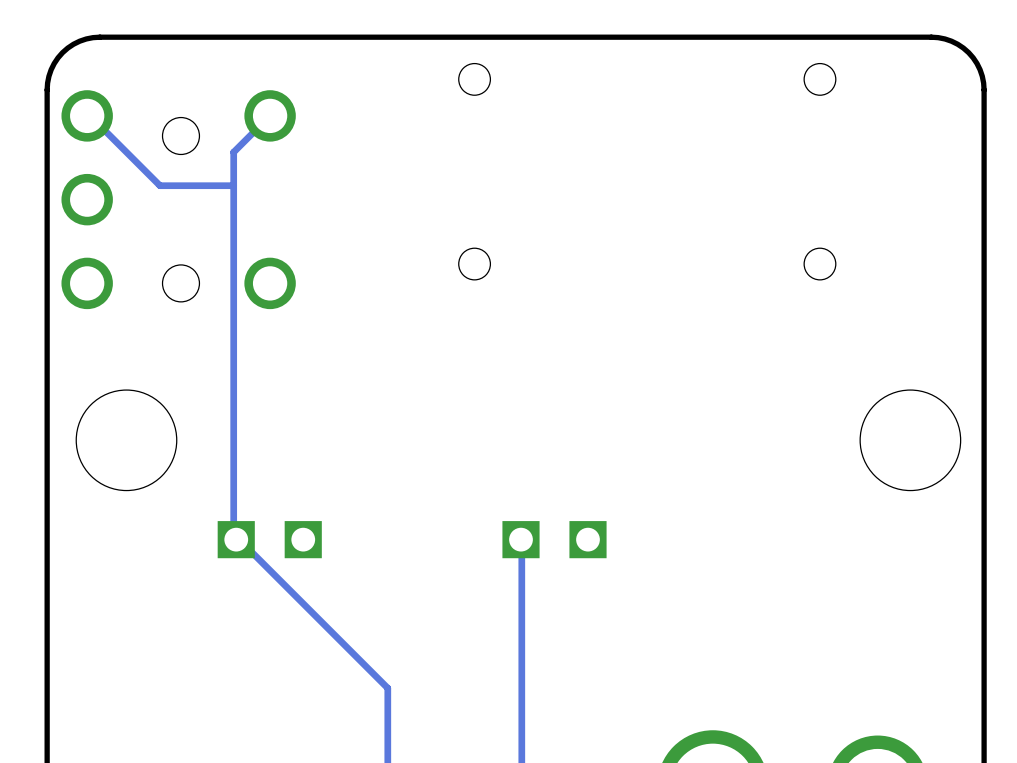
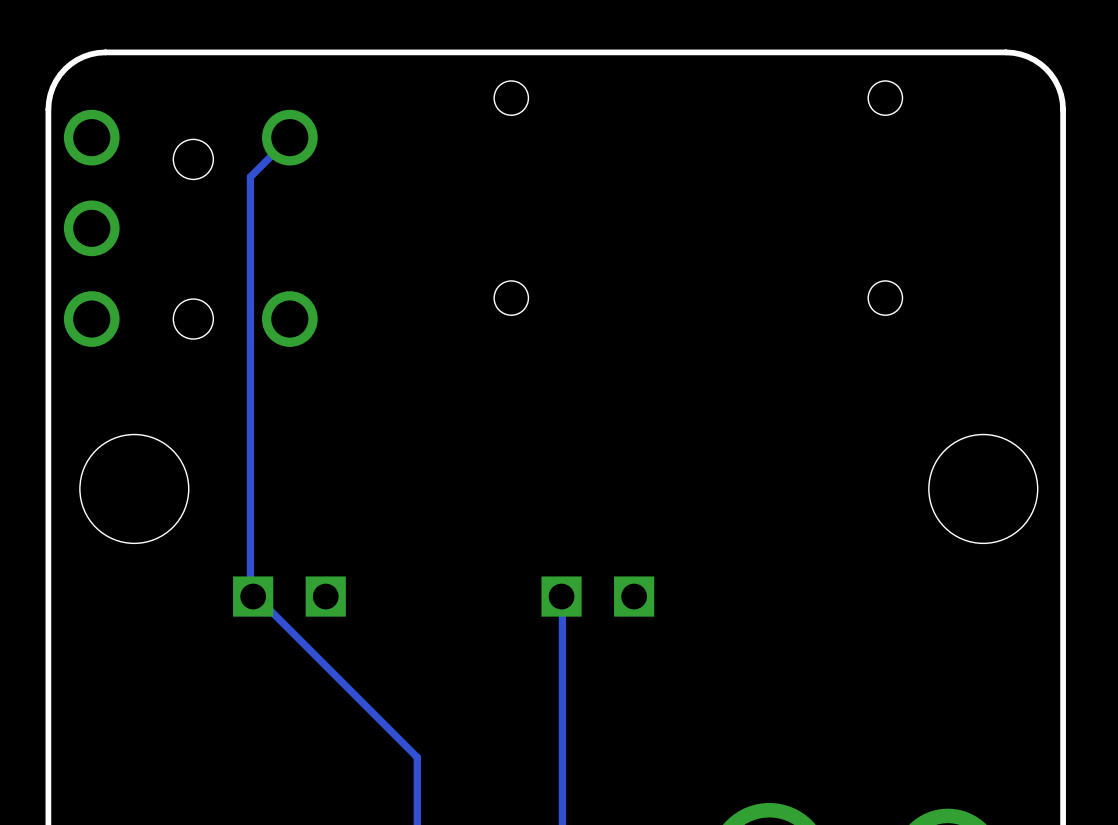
track: (87, 115) (92, 118) (159, 185) (233, 185) -> none

